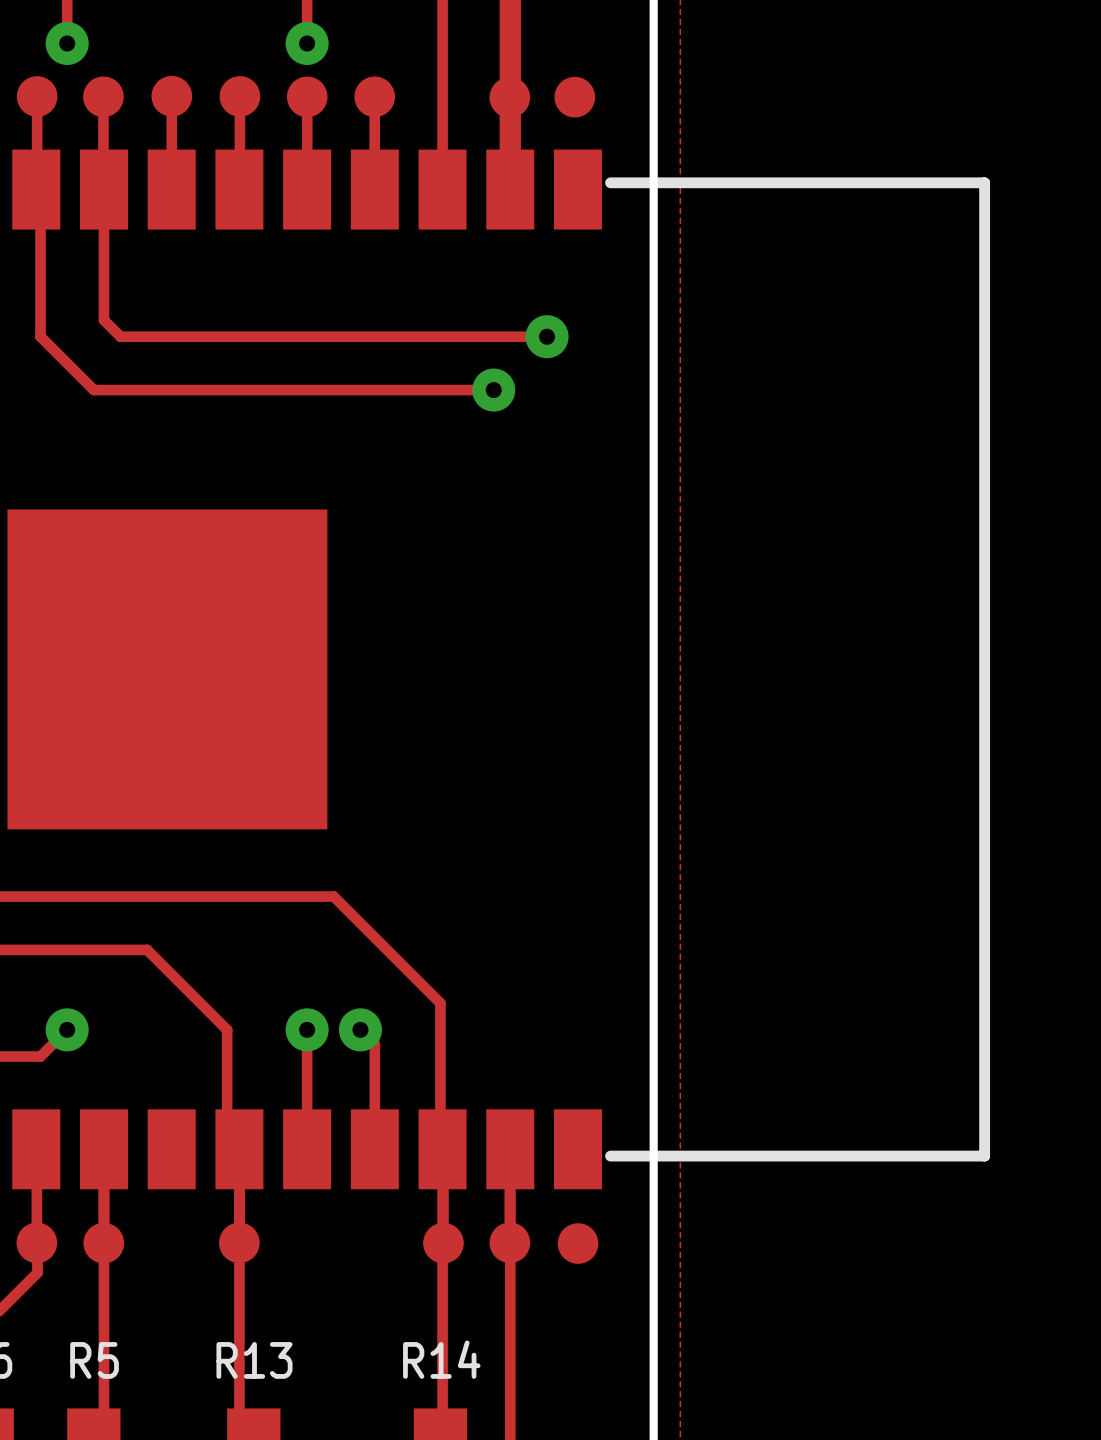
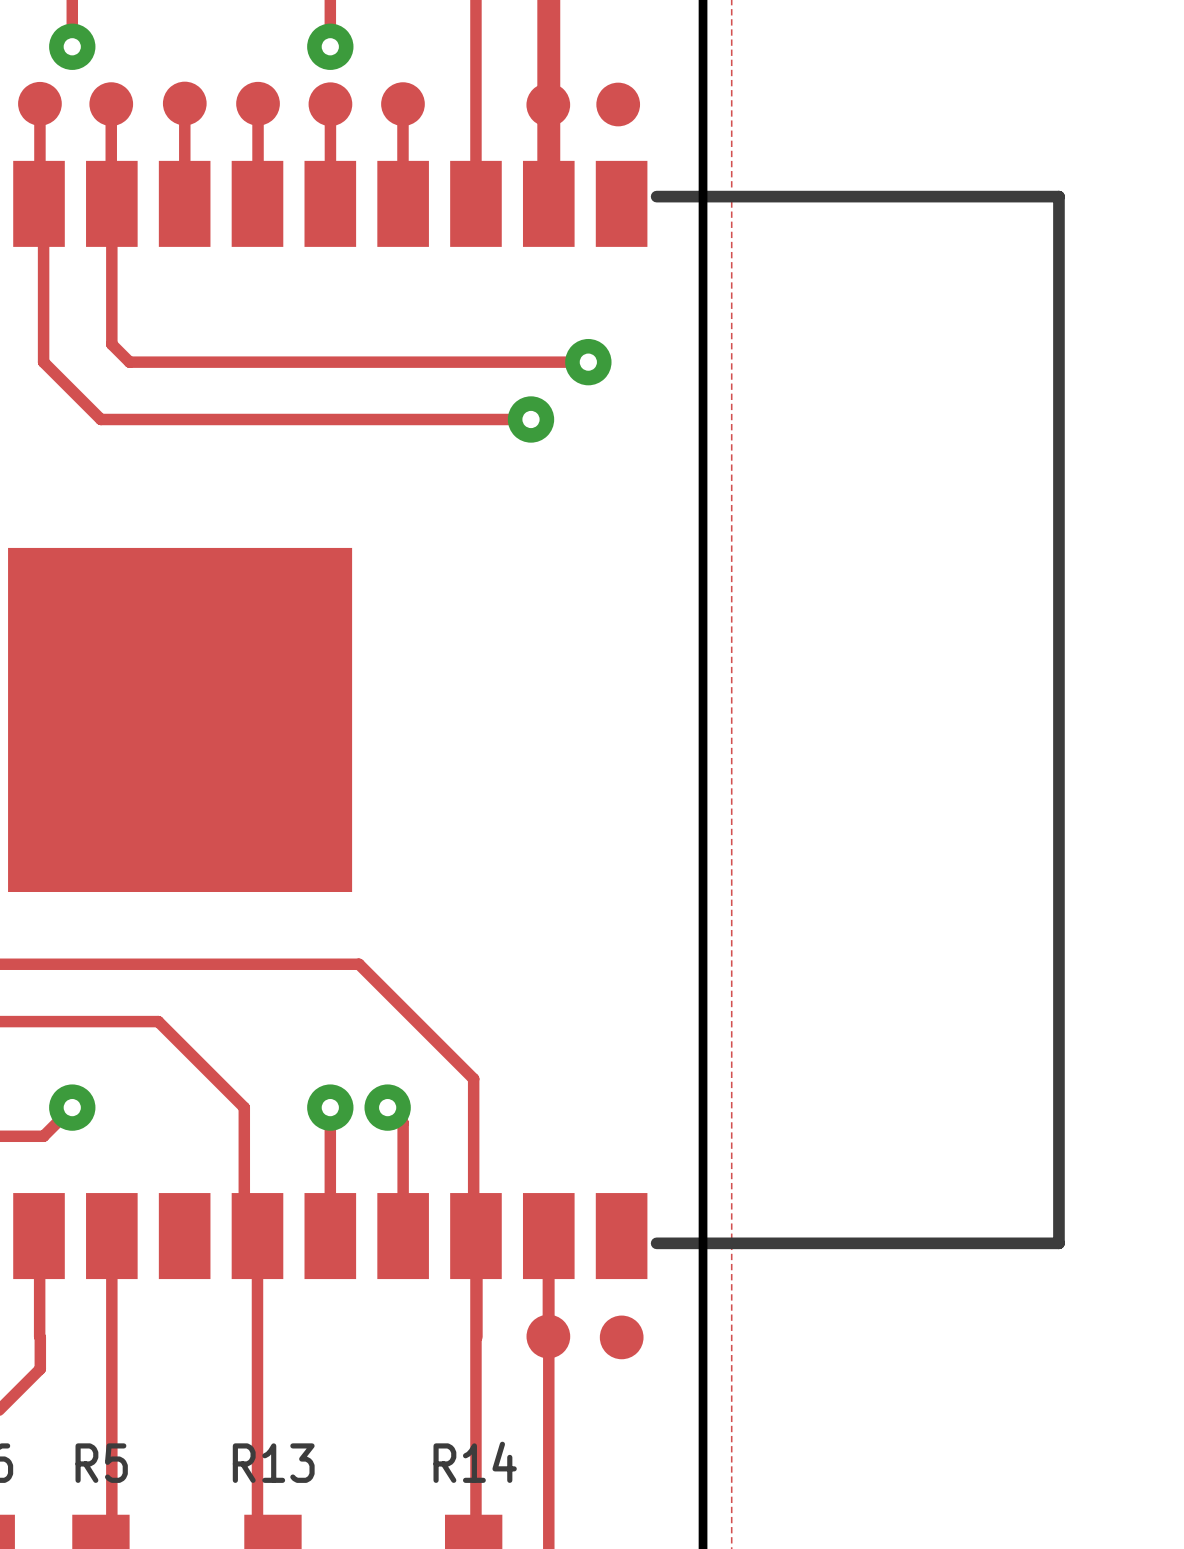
part: (36, 1242) -> none
part: (239, 1242) -> none
part: (103, 1243) -> none
part: (443, 1243) -> none

